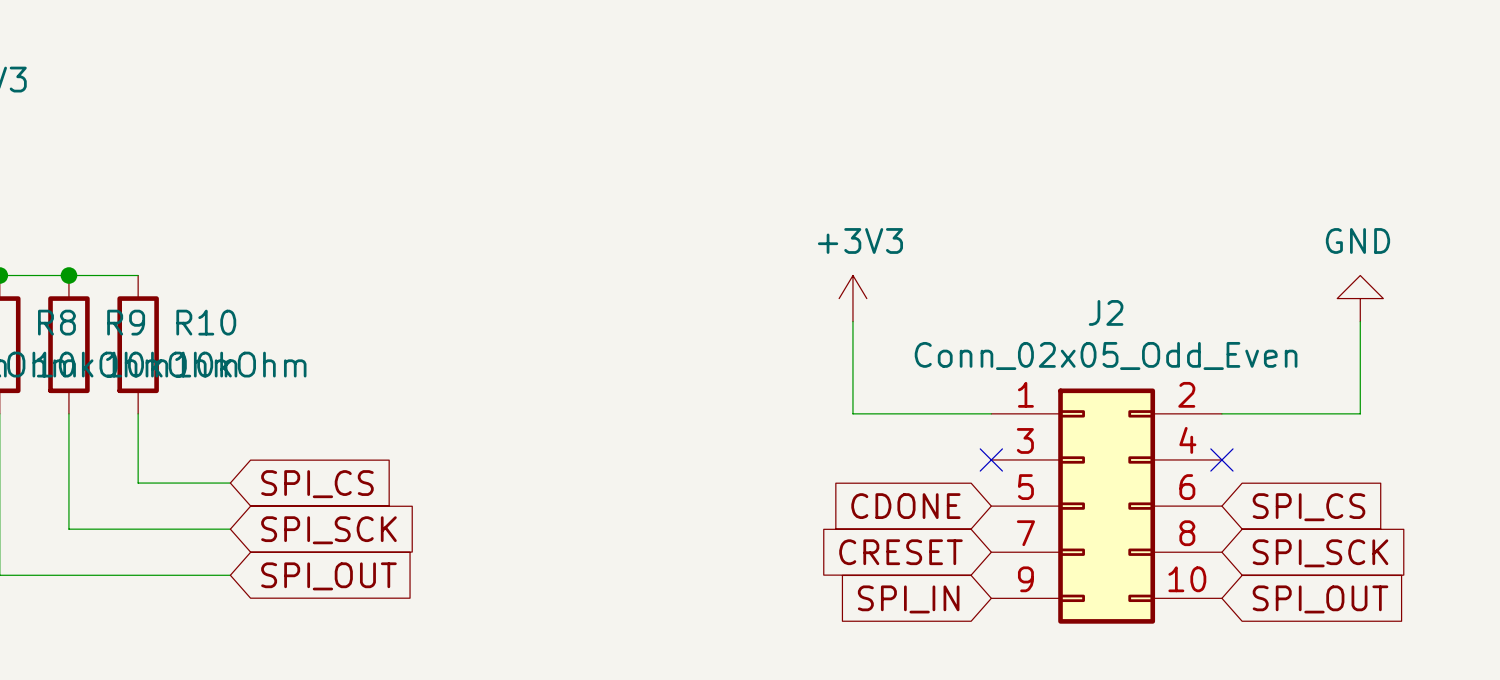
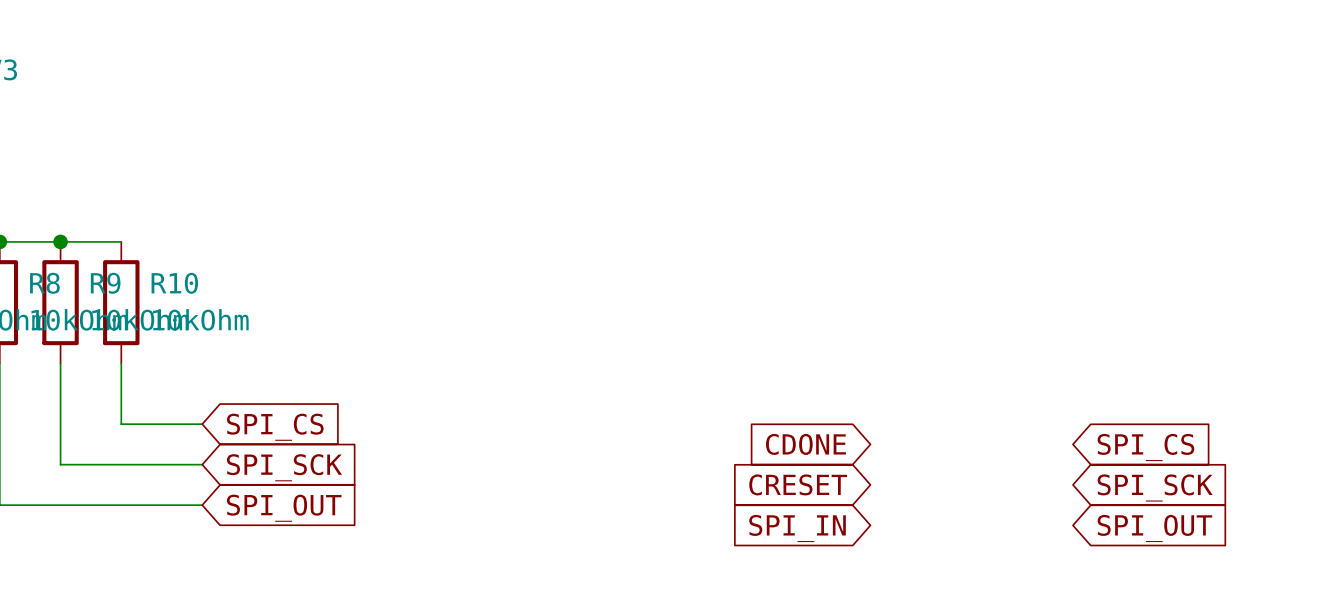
power symbol: +3V3 (852, 298) -> none
power symbol: GND (1360, 298) -> none
wire: (852, 321) (852, 413) (991, 413) -> none
wire: (1360, 321) (1360, 413) (1221, 413) -> none
no-connect mark: (991, 459) -> none
no-connect mark: (1221, 459) -> none
J2: Conn_02x05_Odd_Even (1106, 506) -> none

